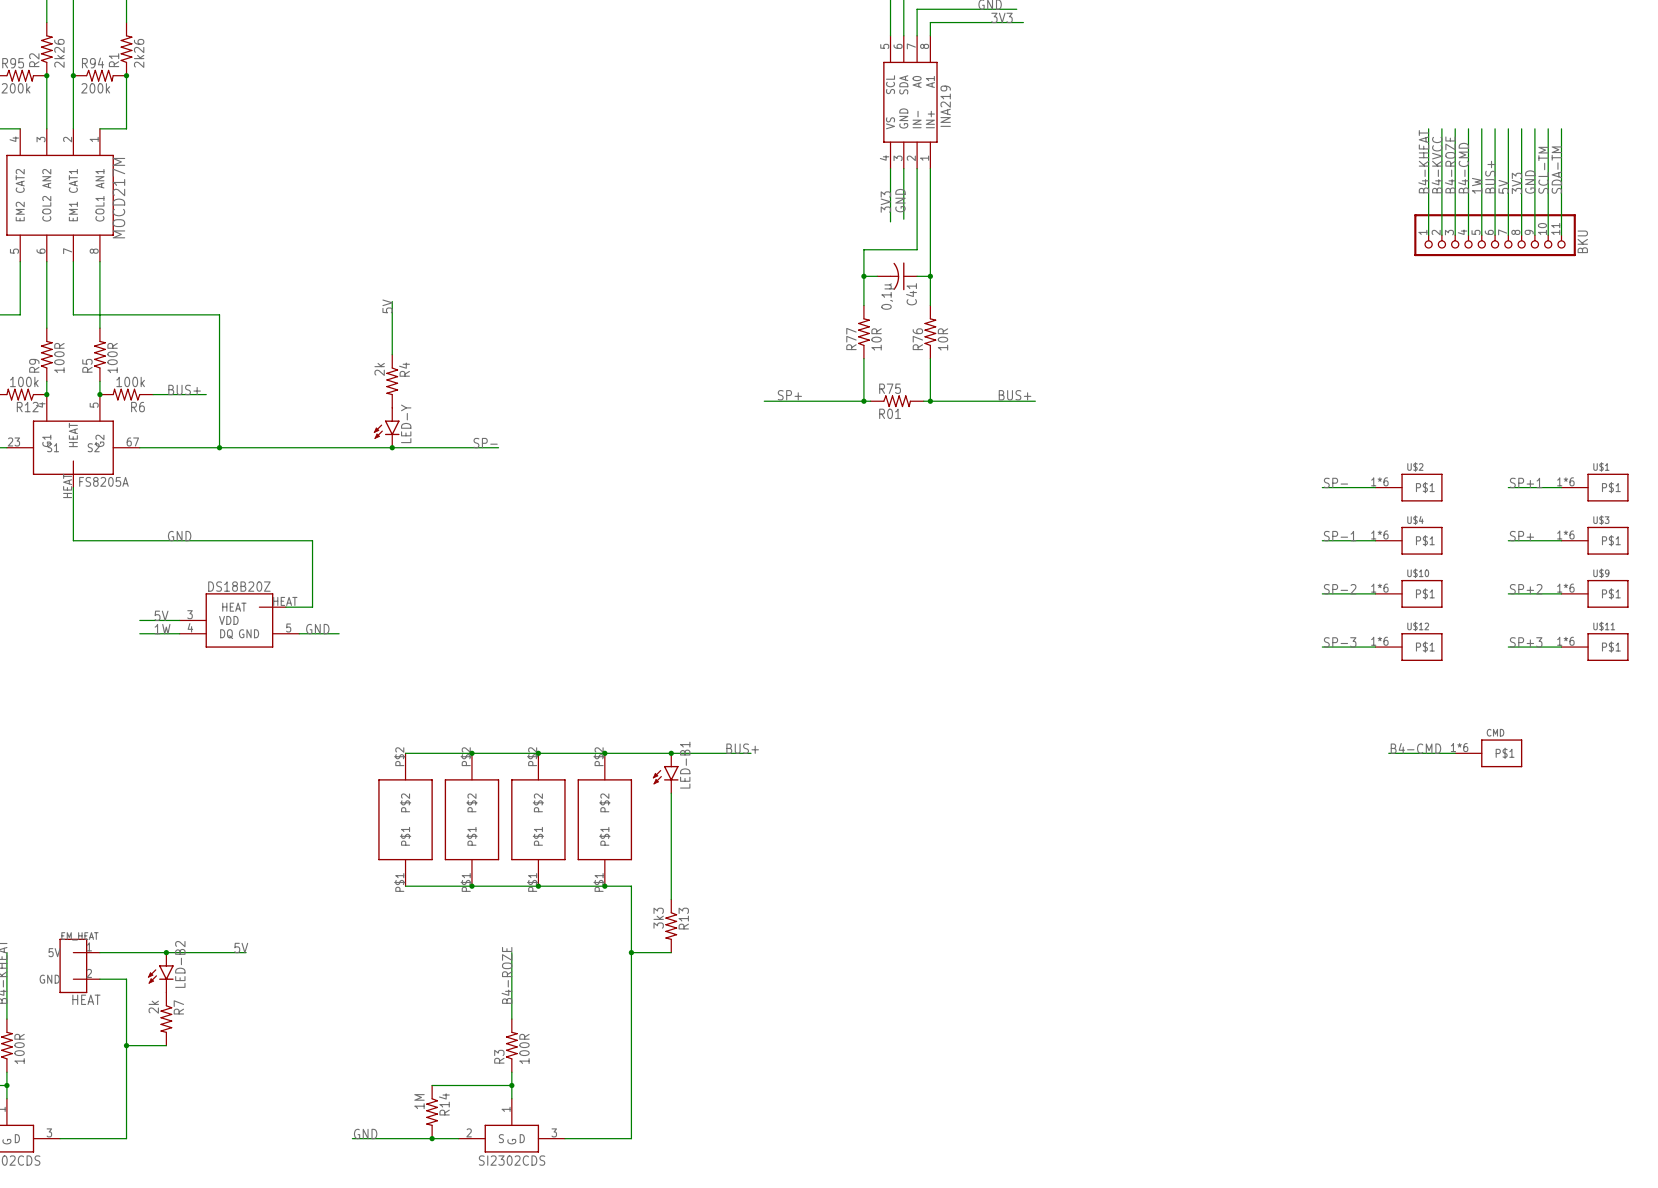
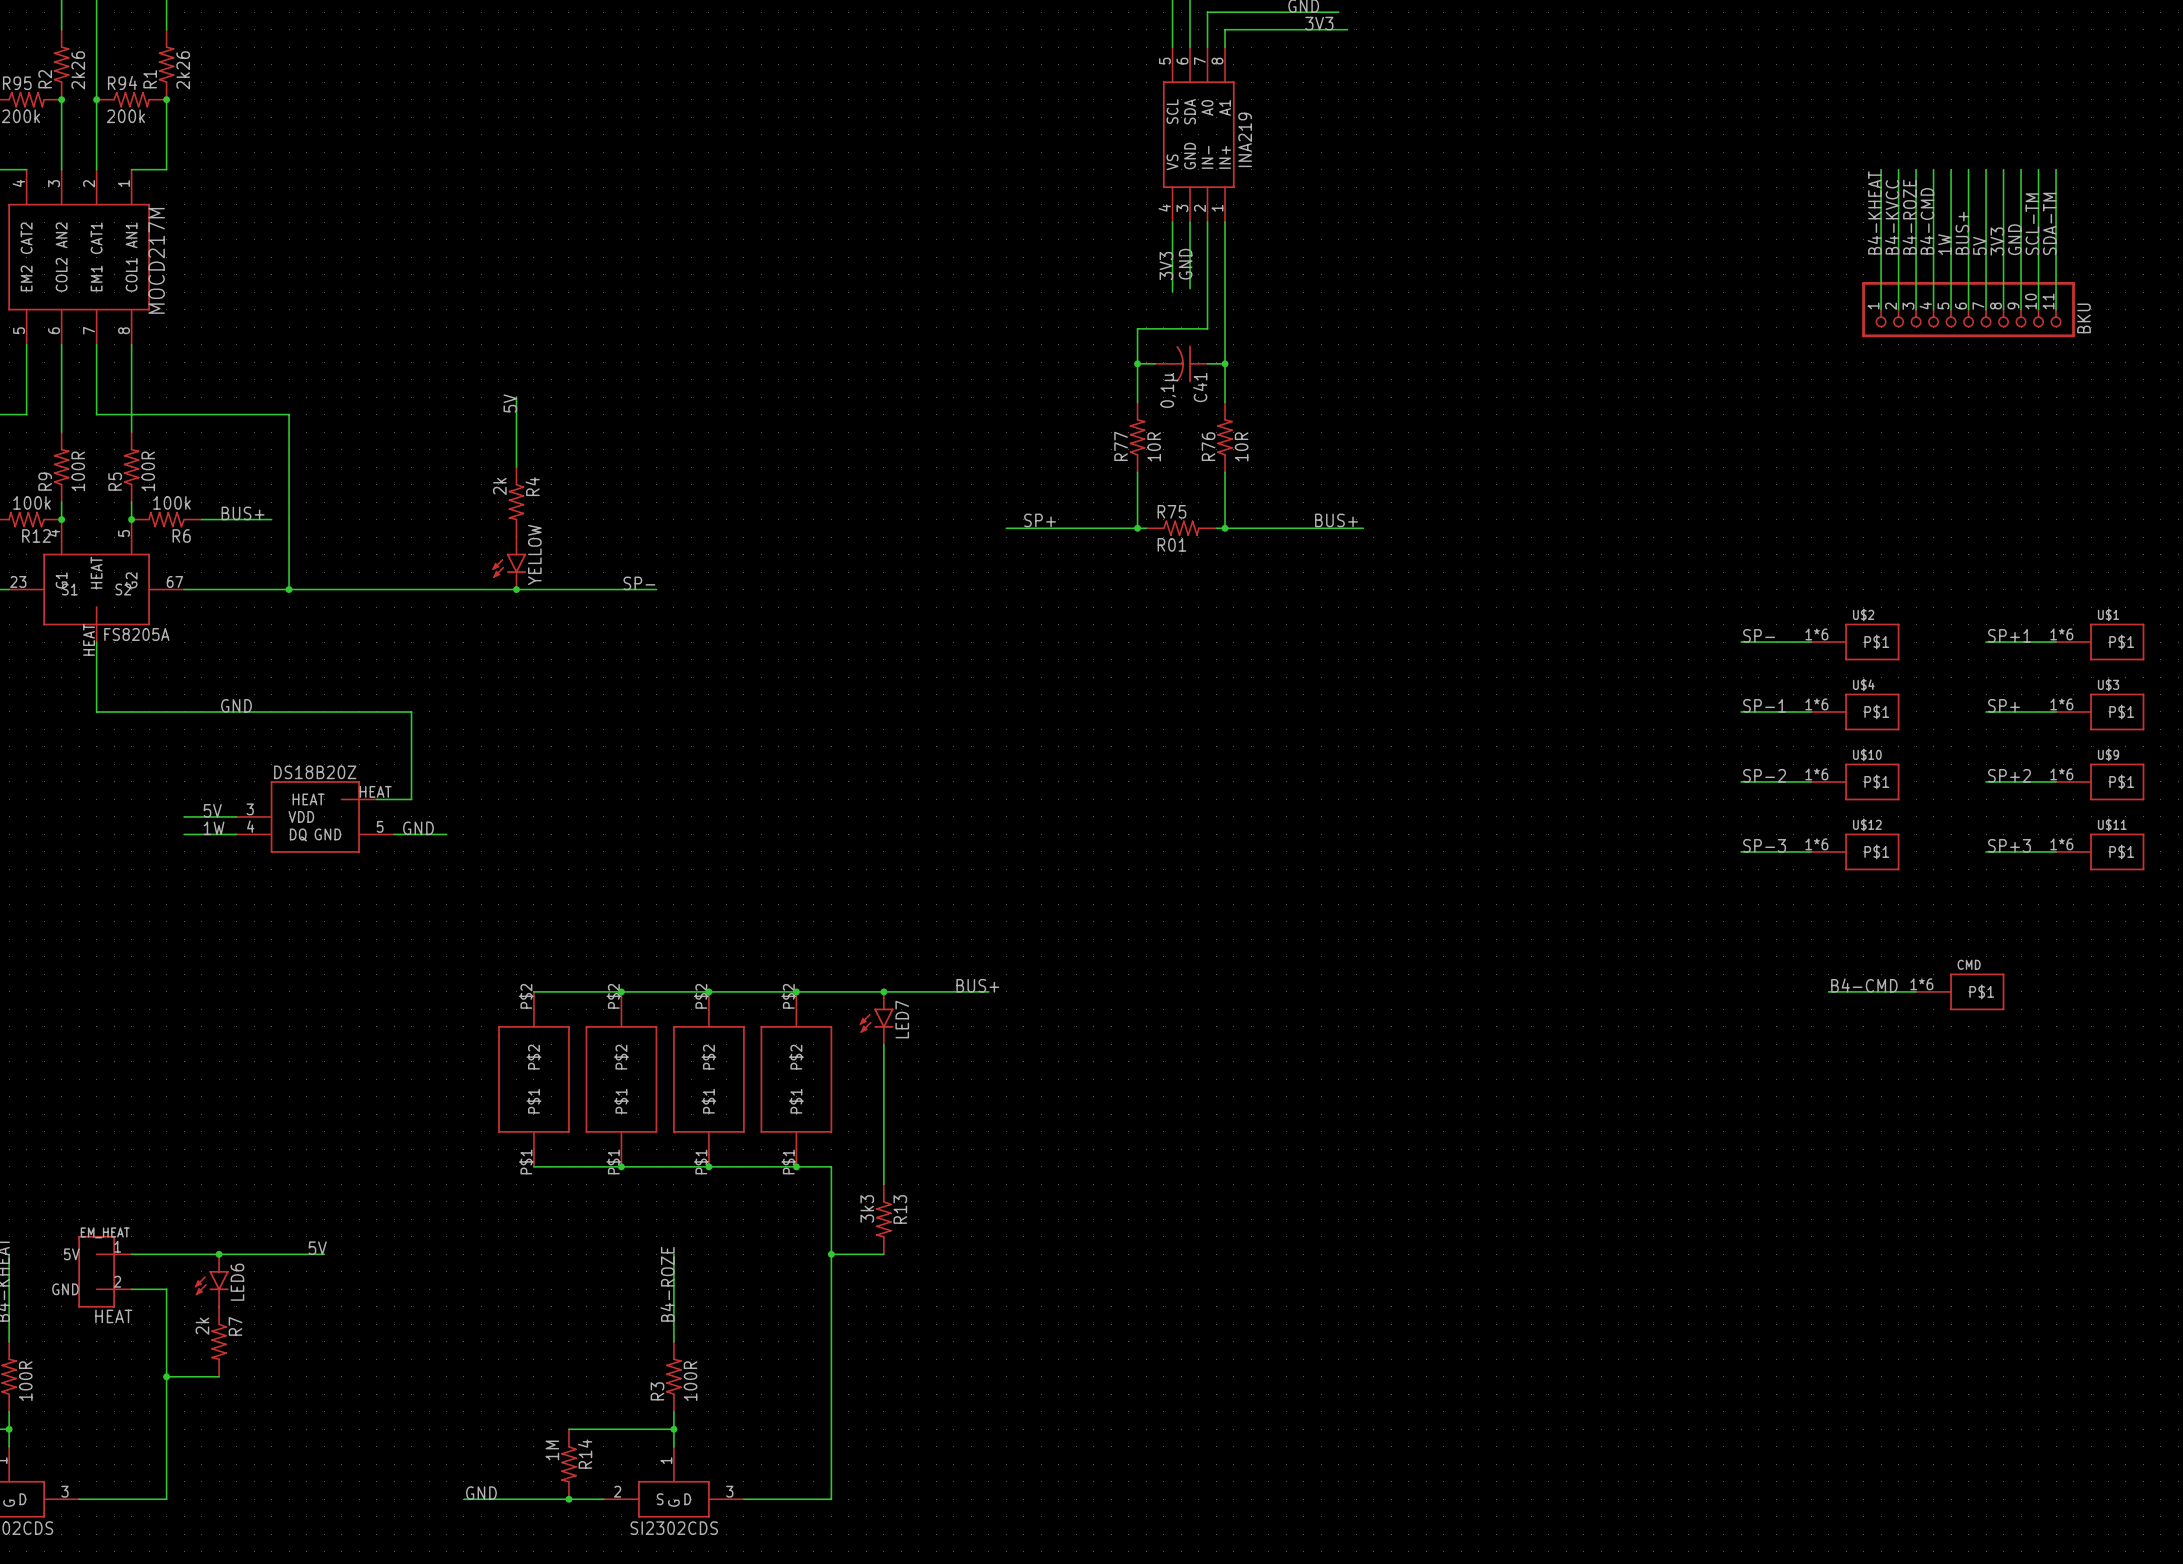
LED-Y name: LED-Y (406, 423) -> YELLOW (534, 554)
LED-B1 name: LED-B1 (685, 765) -> LED7 (902, 1019)
LED-B2 name: LED-B2 (180, 964) -> LED6 (237, 1282)

